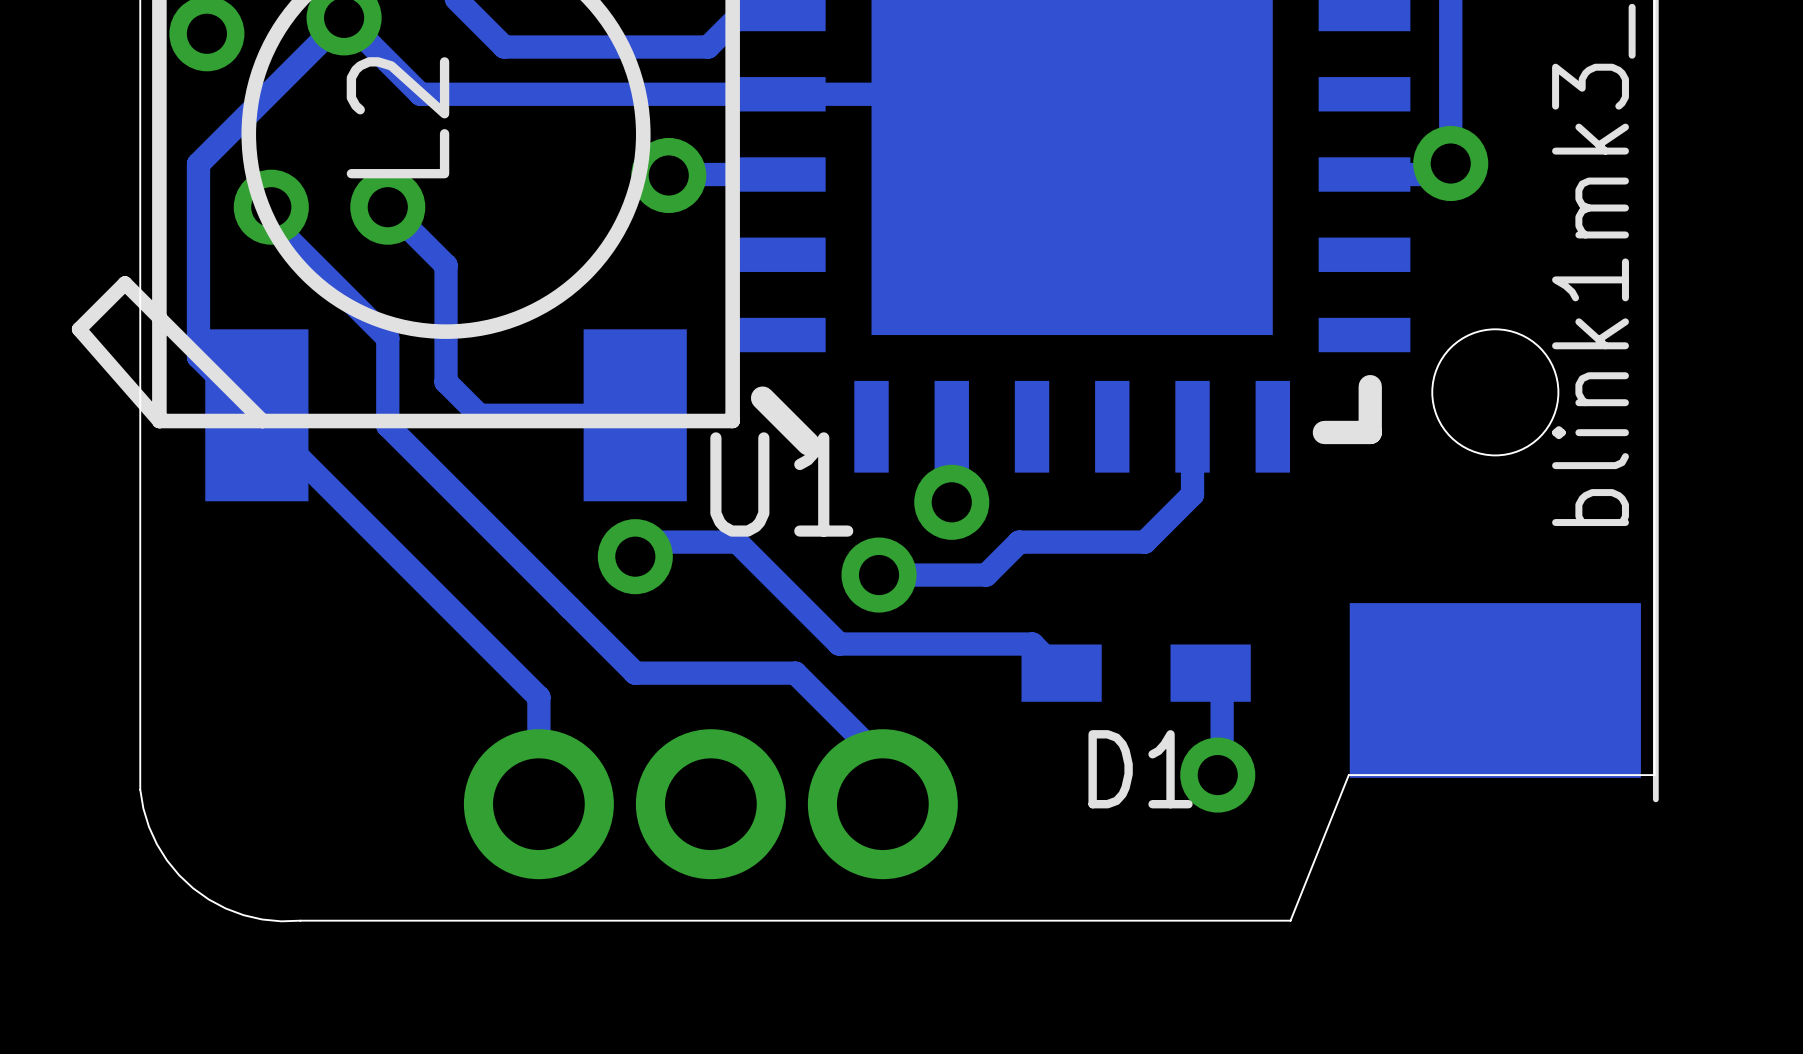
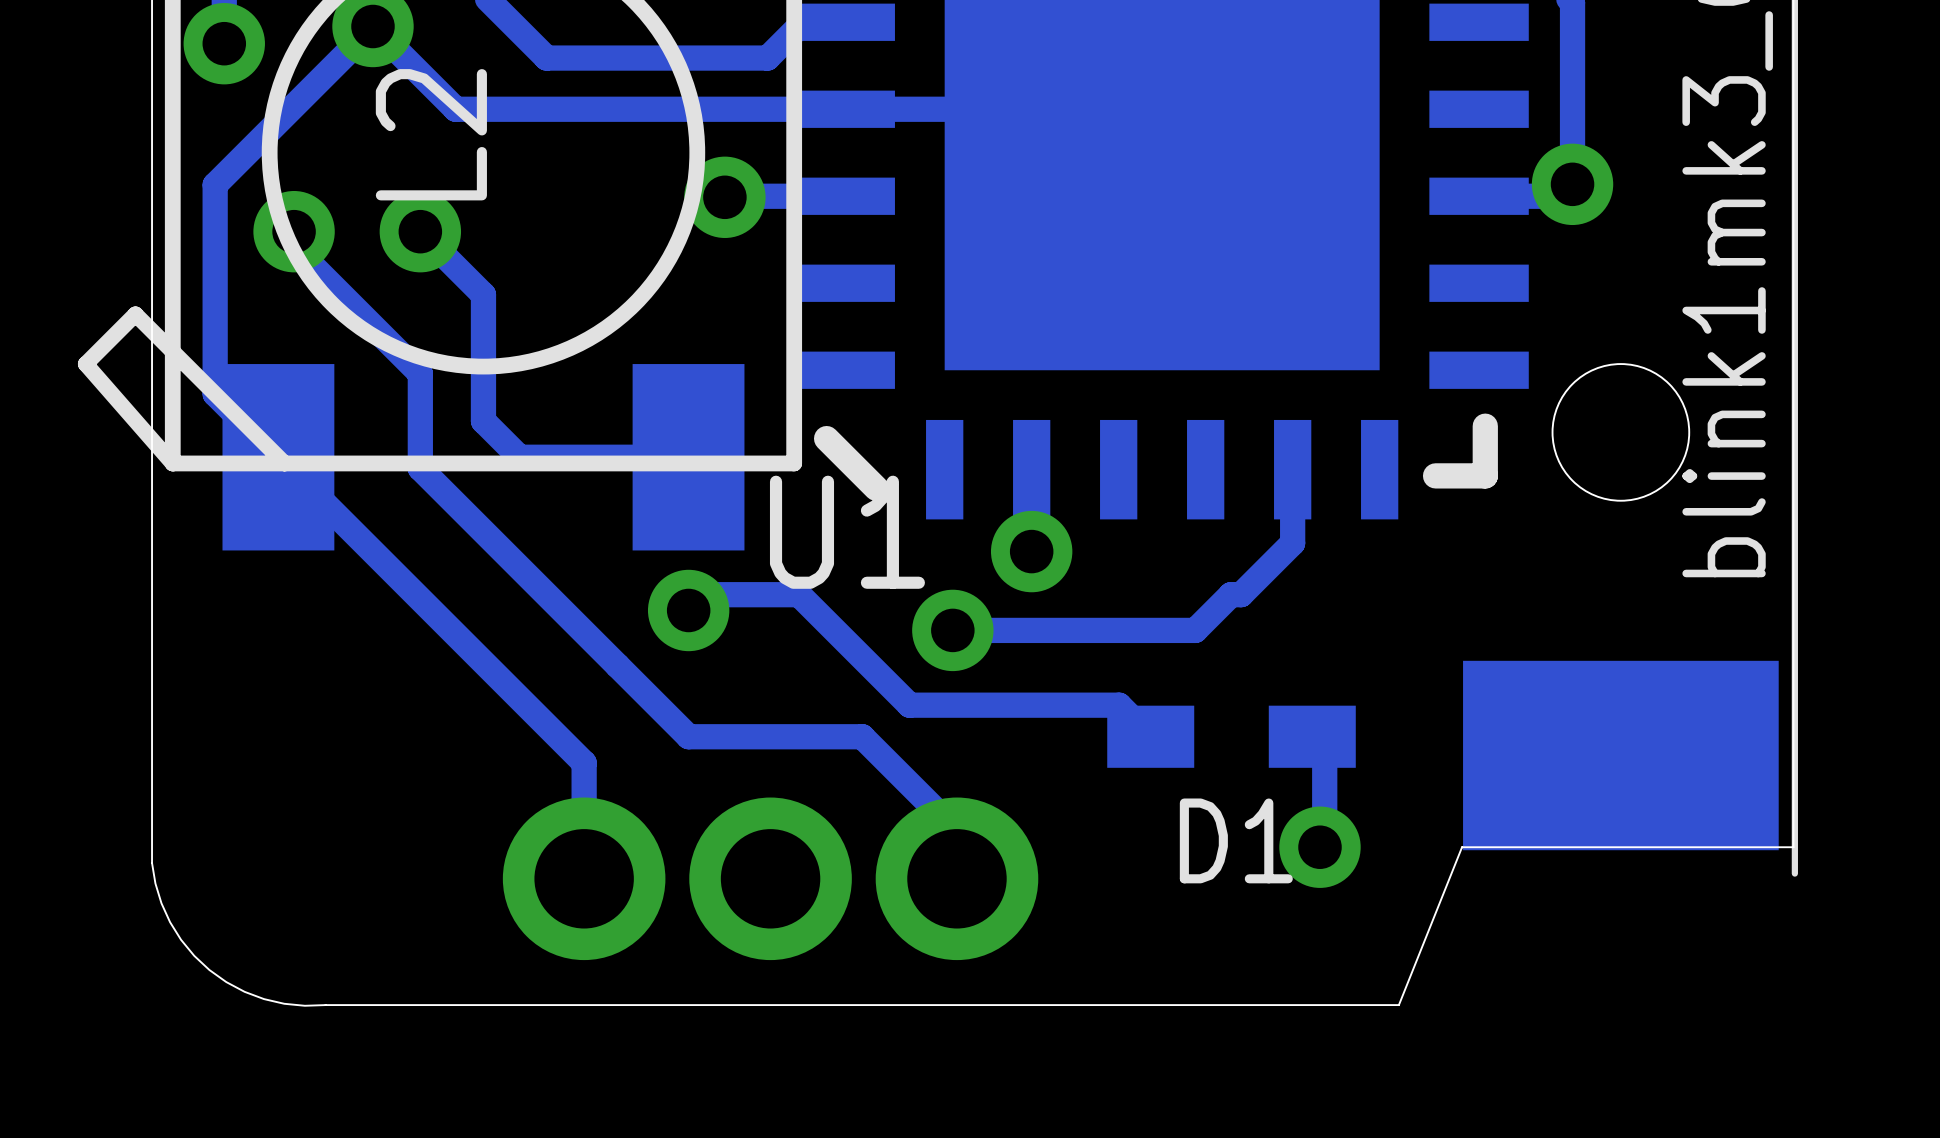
track: (1135, 542) (1019, 542) (986, 575) -> (1230, 594) (1195, 630) (1069, 630)

